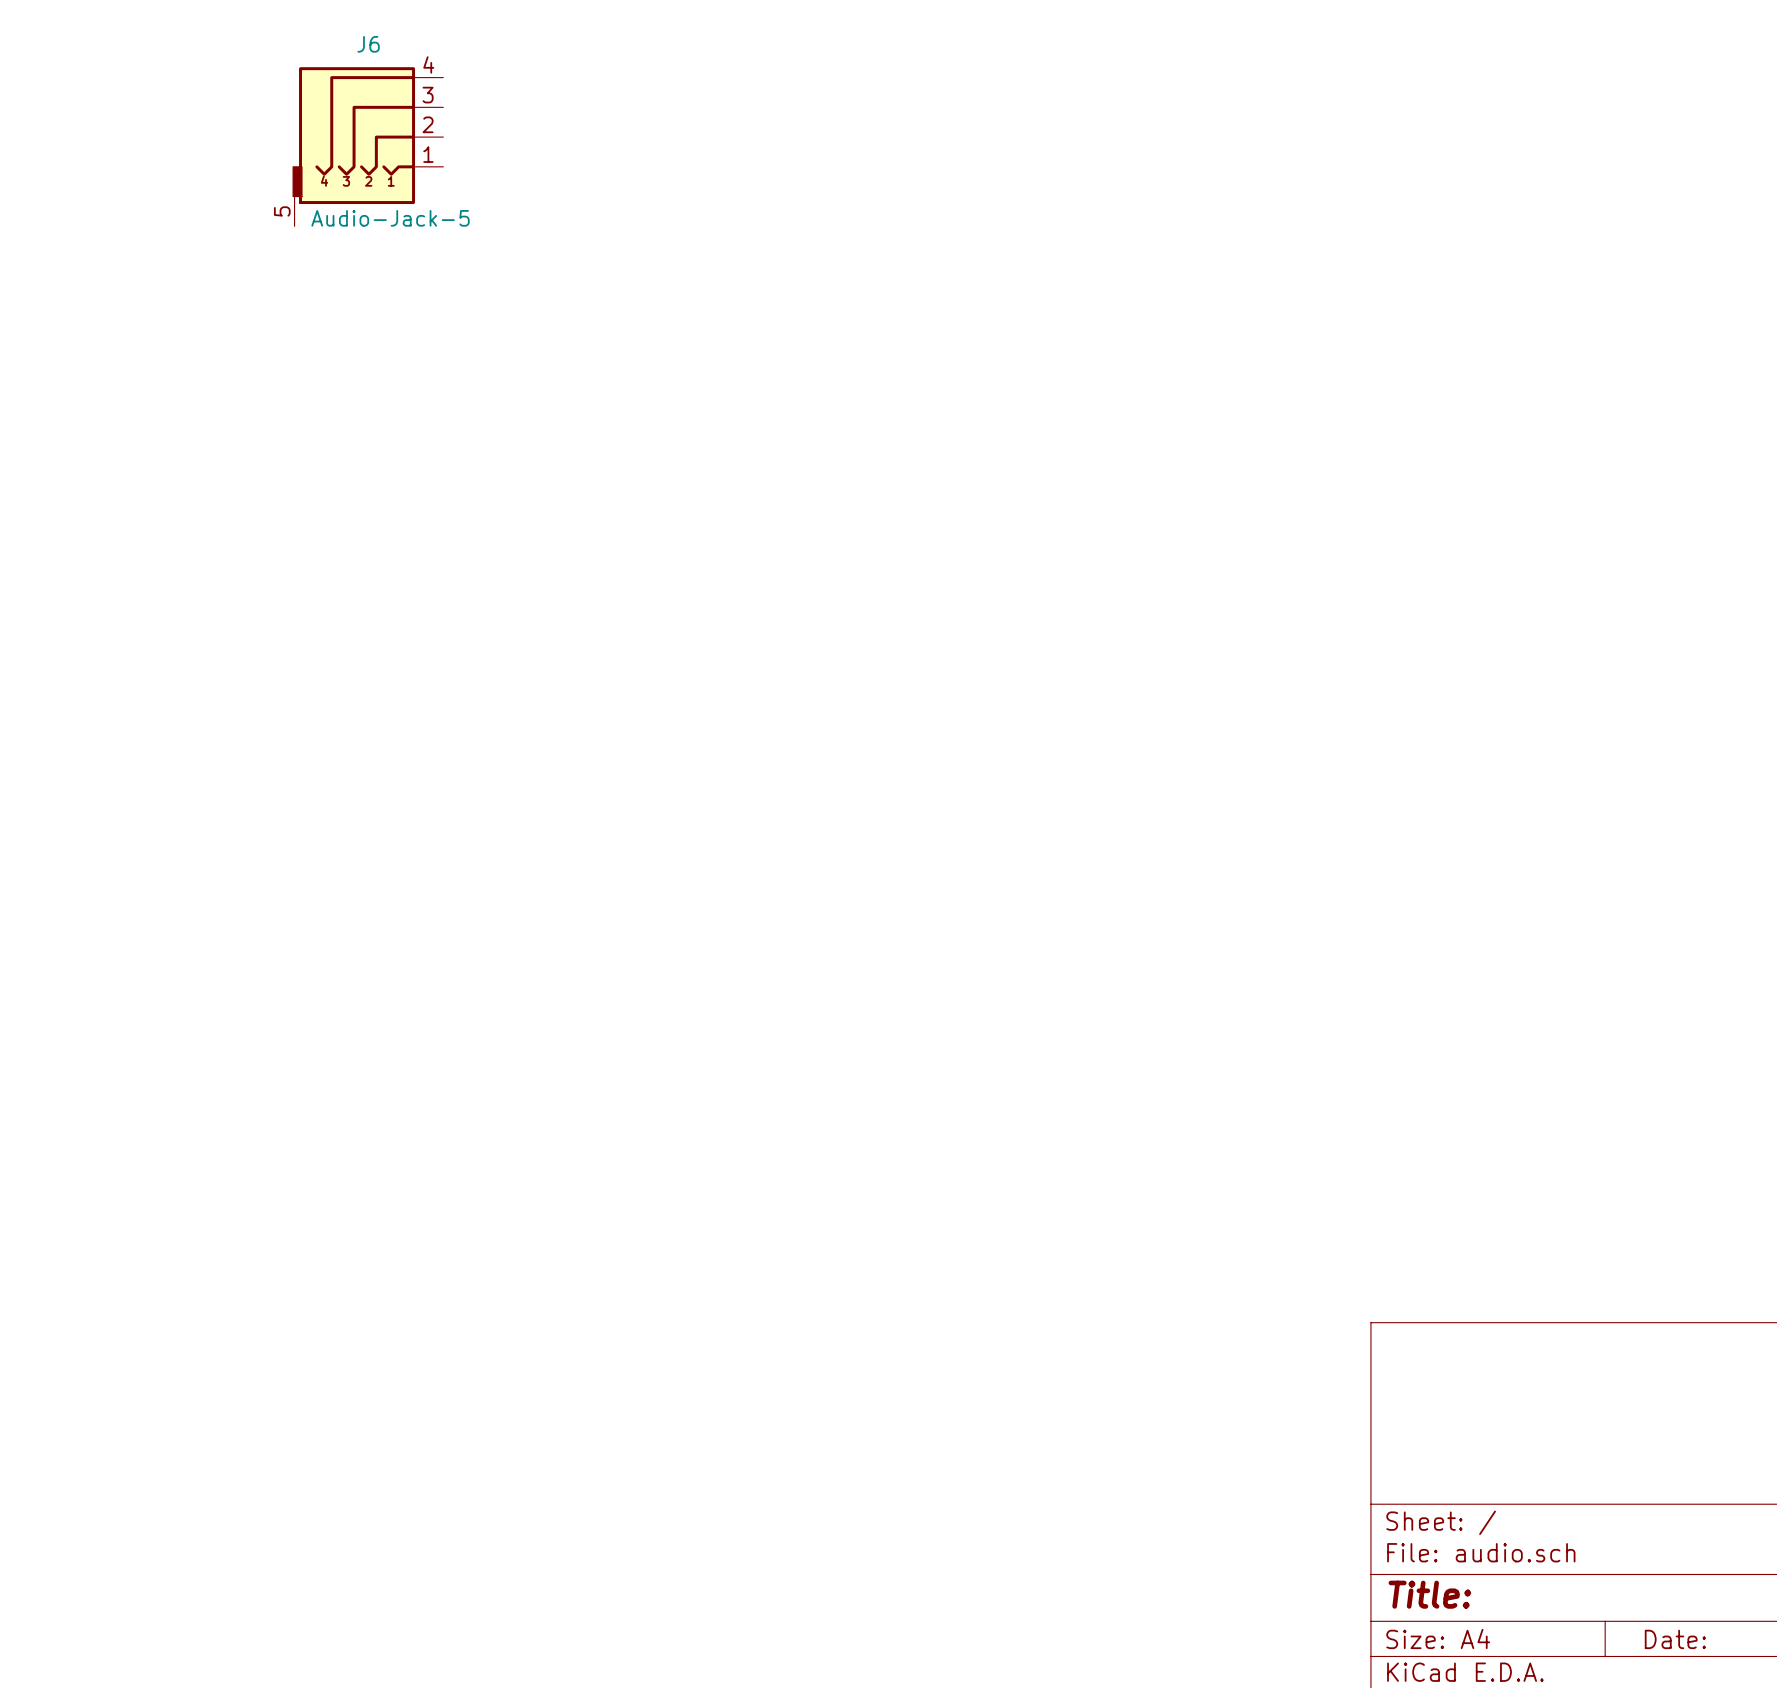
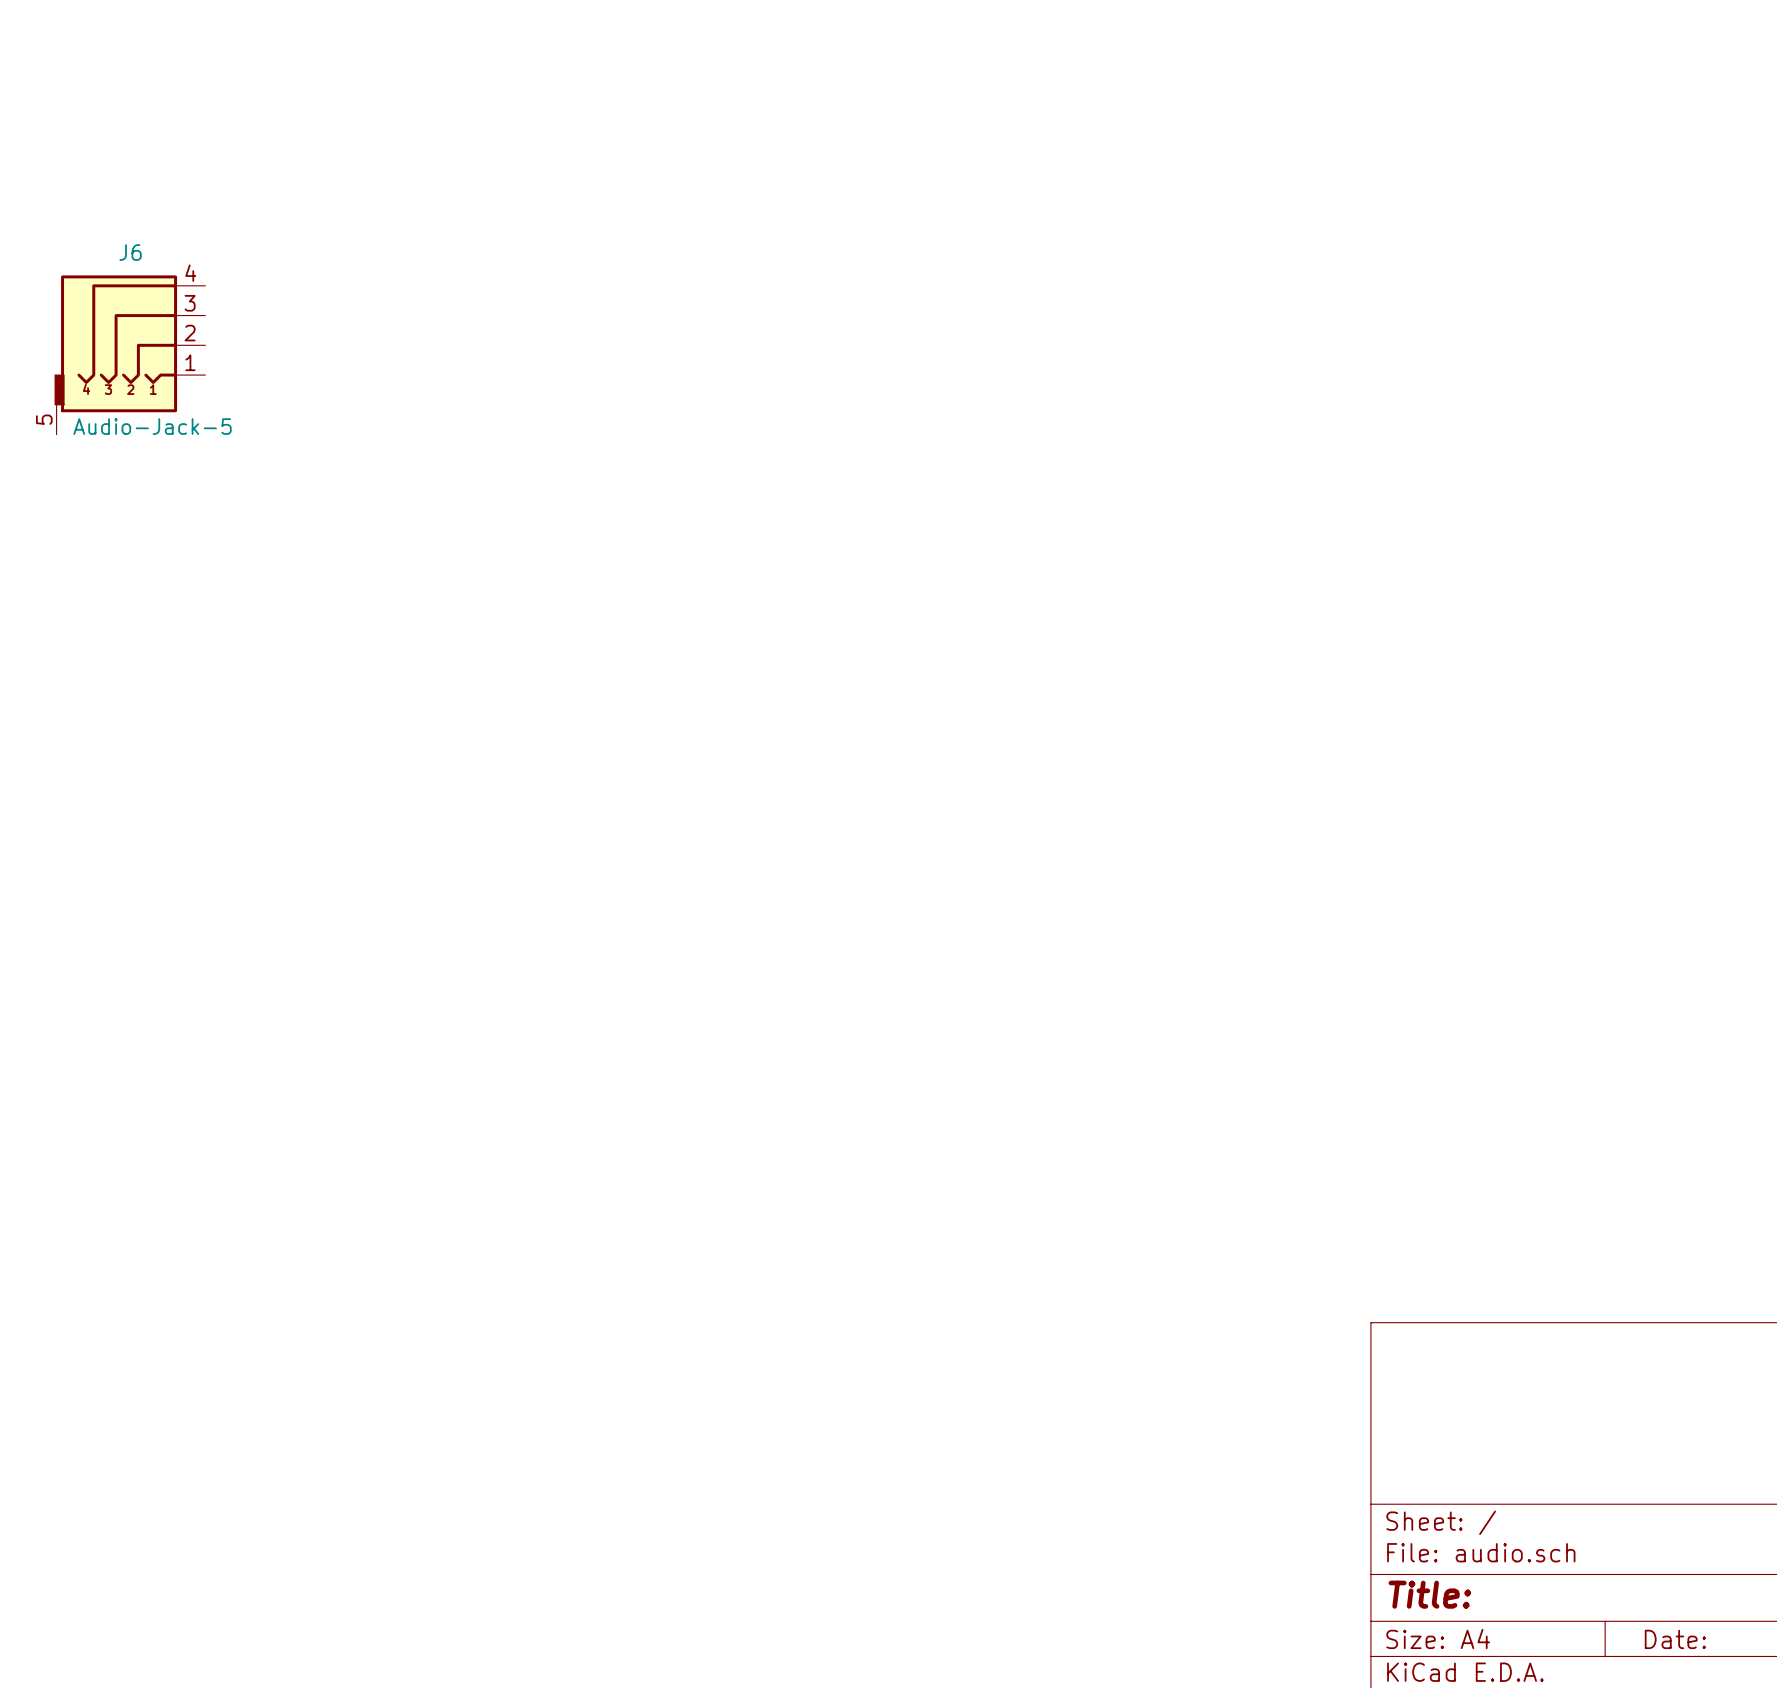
J6 position: (368, 146) -> (130, 354)

